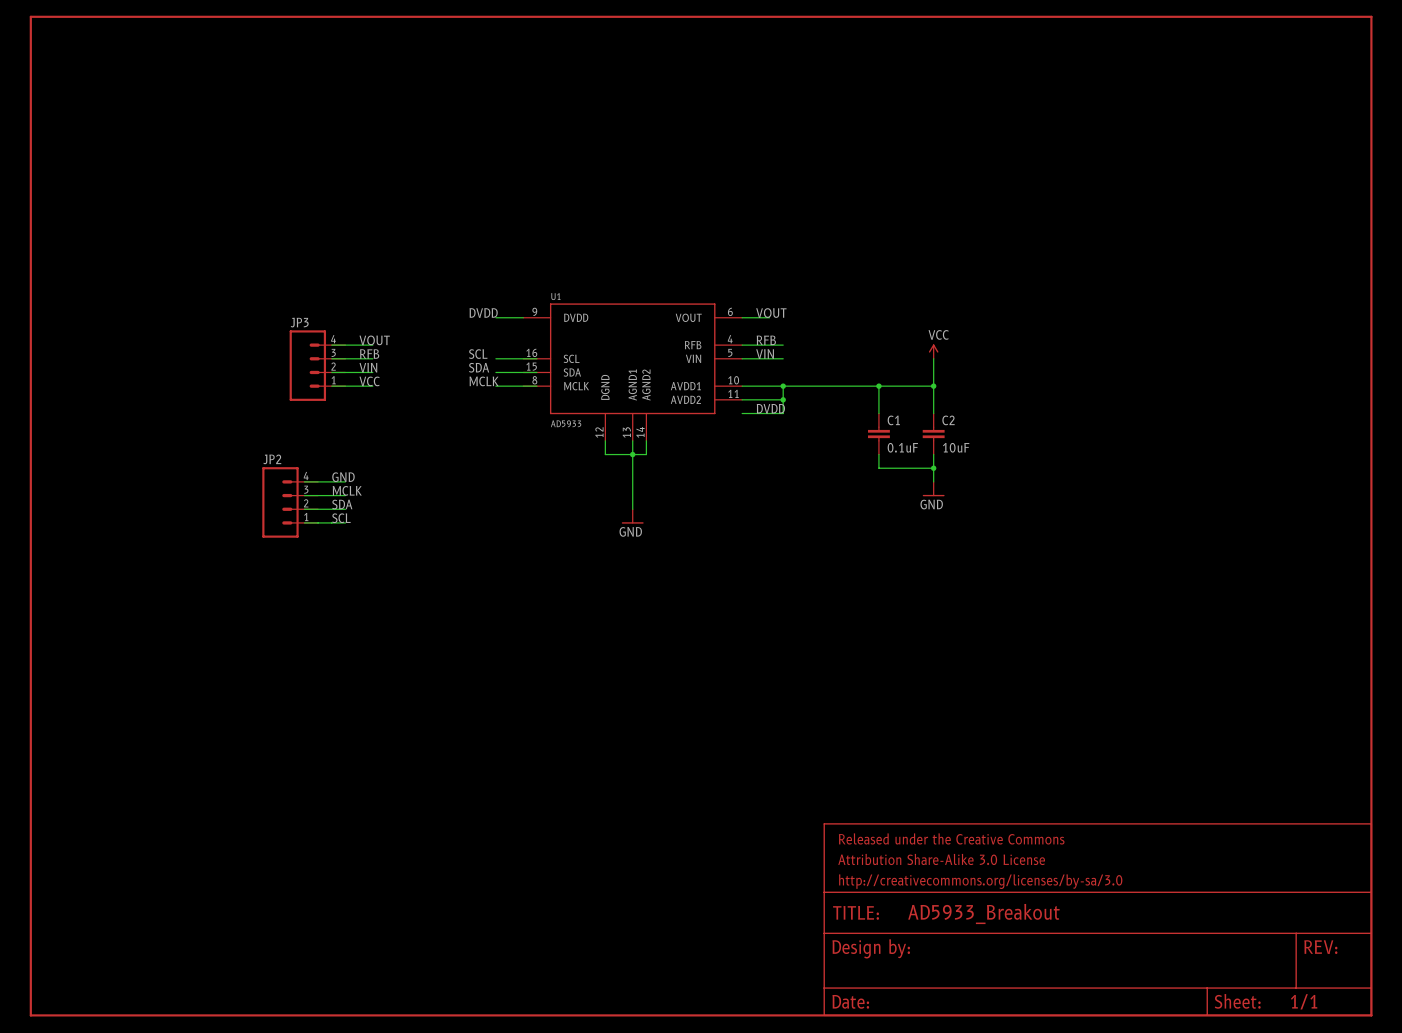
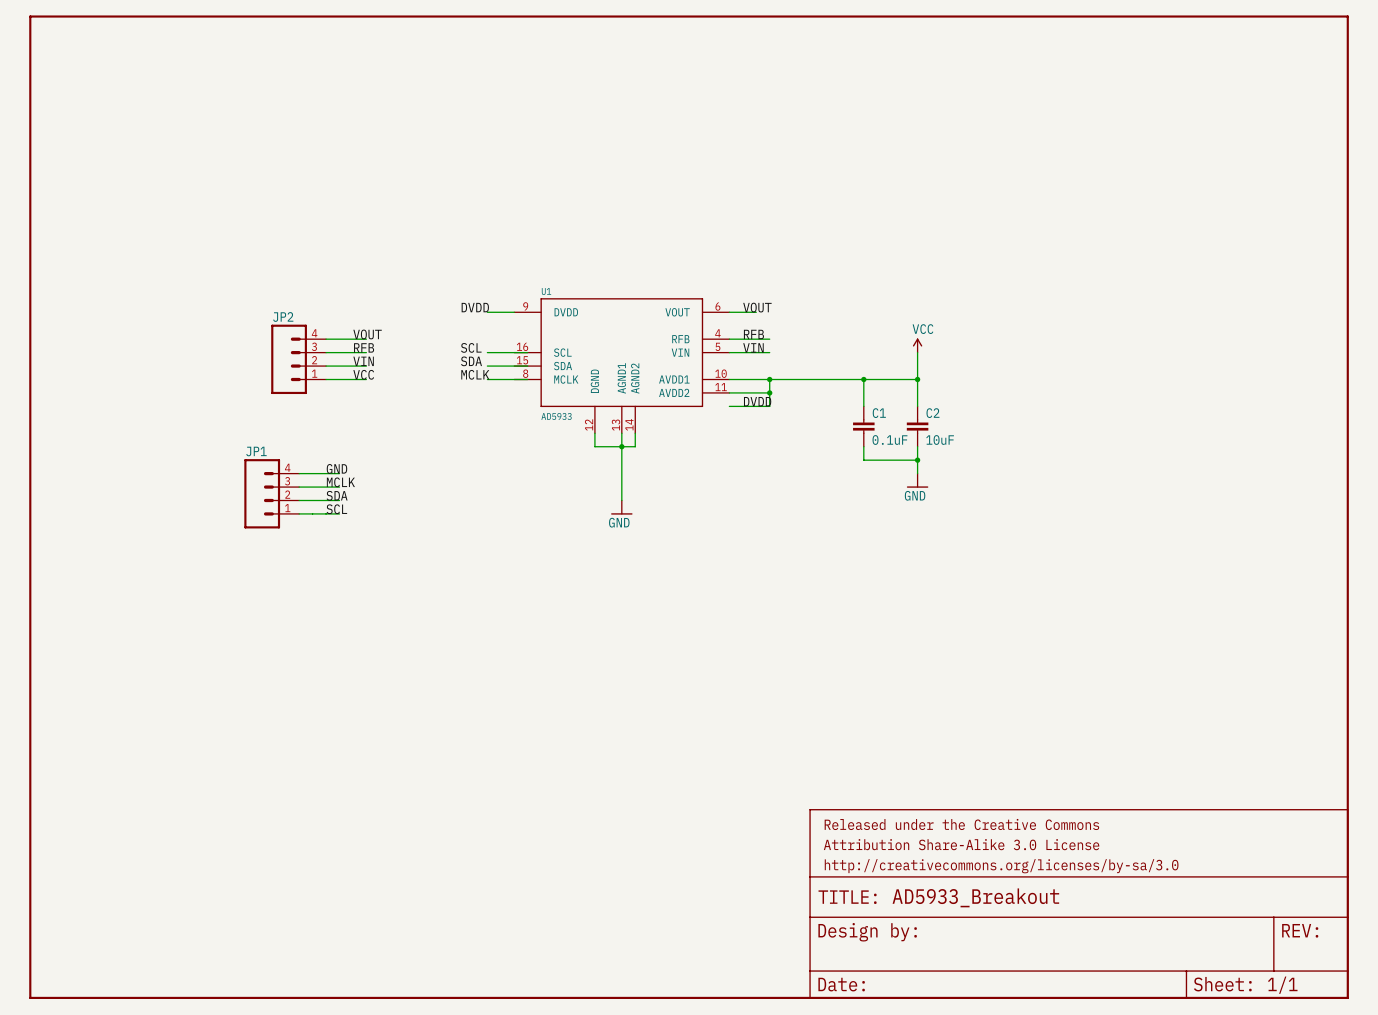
JP3: (317, 365) -> none
JP1: none -> (271, 493)
JP2 position: (290, 502) -> (298, 359)

